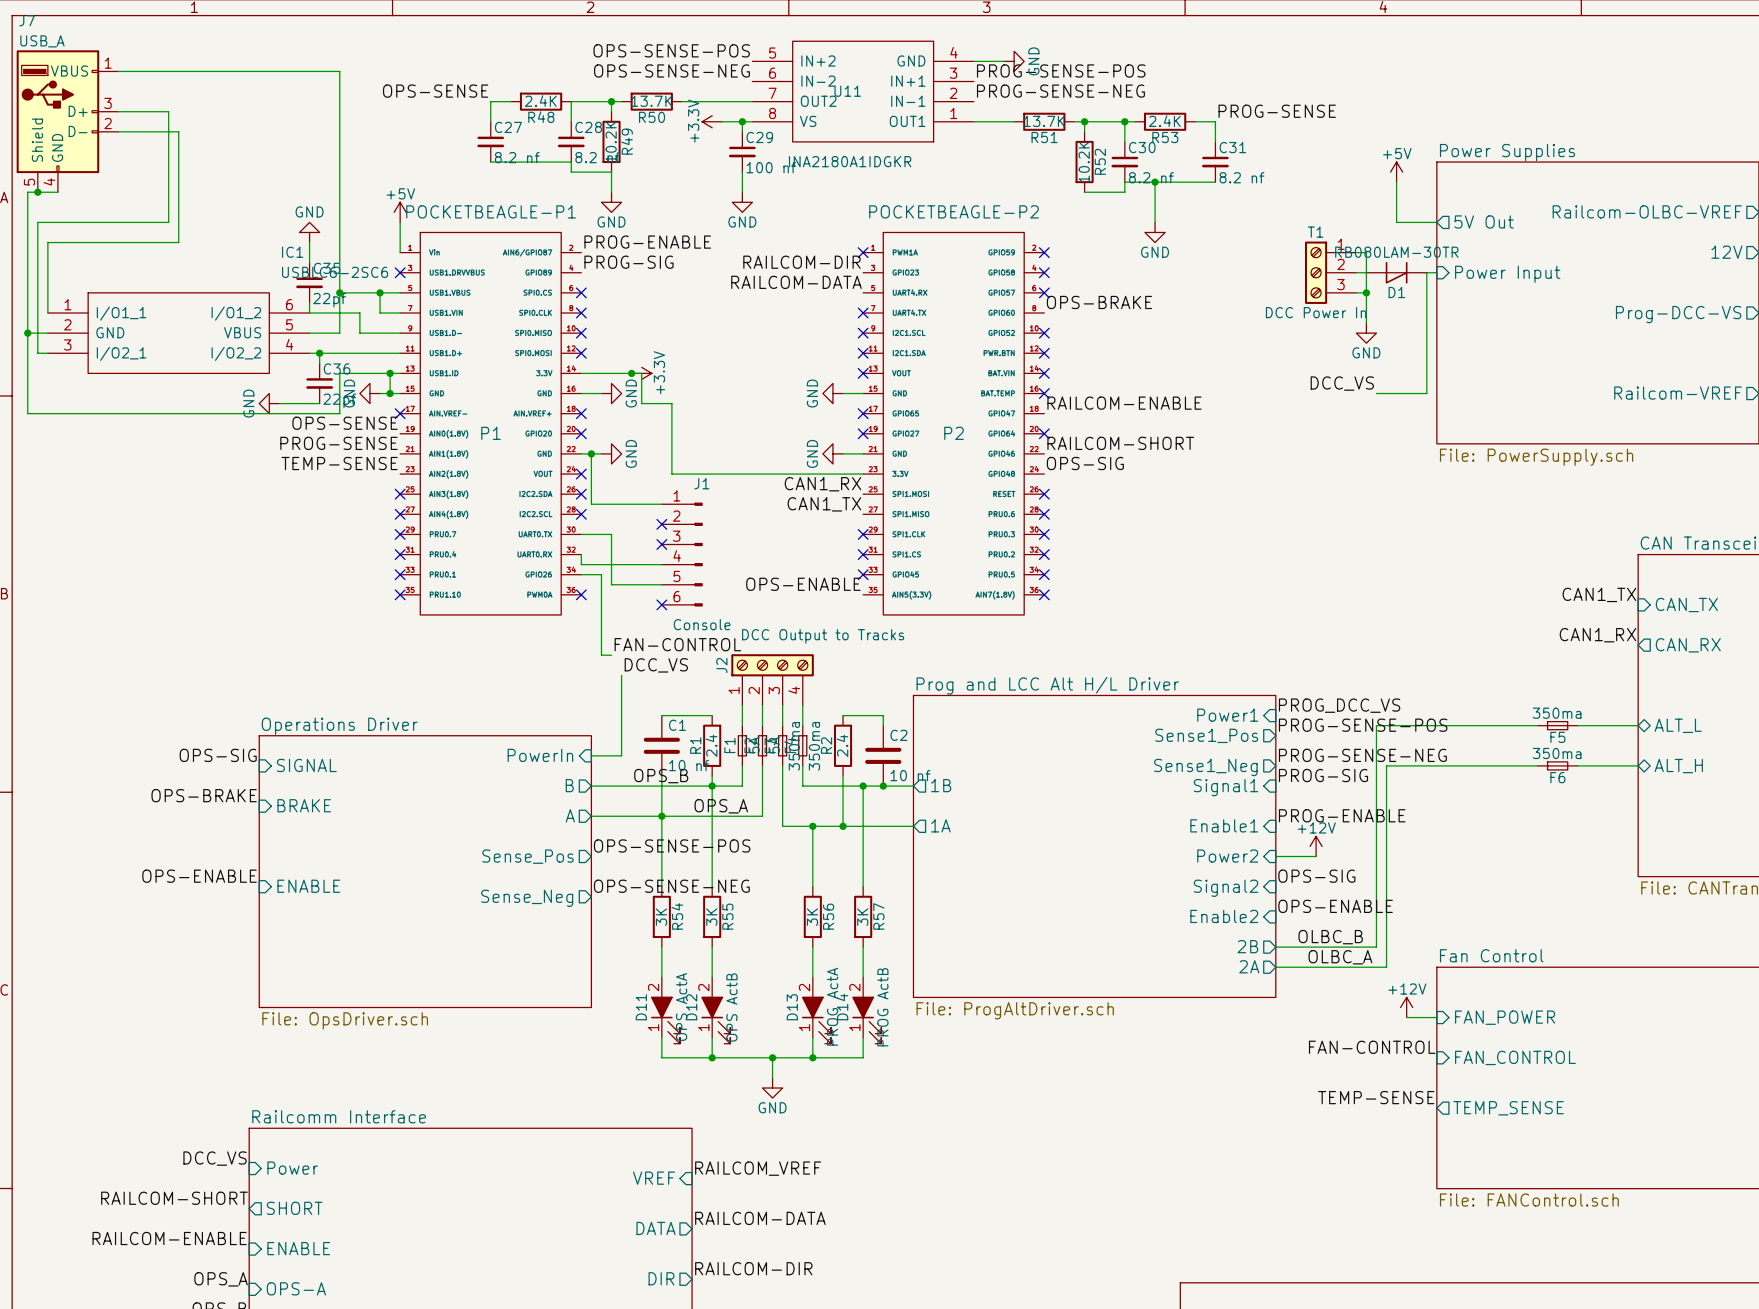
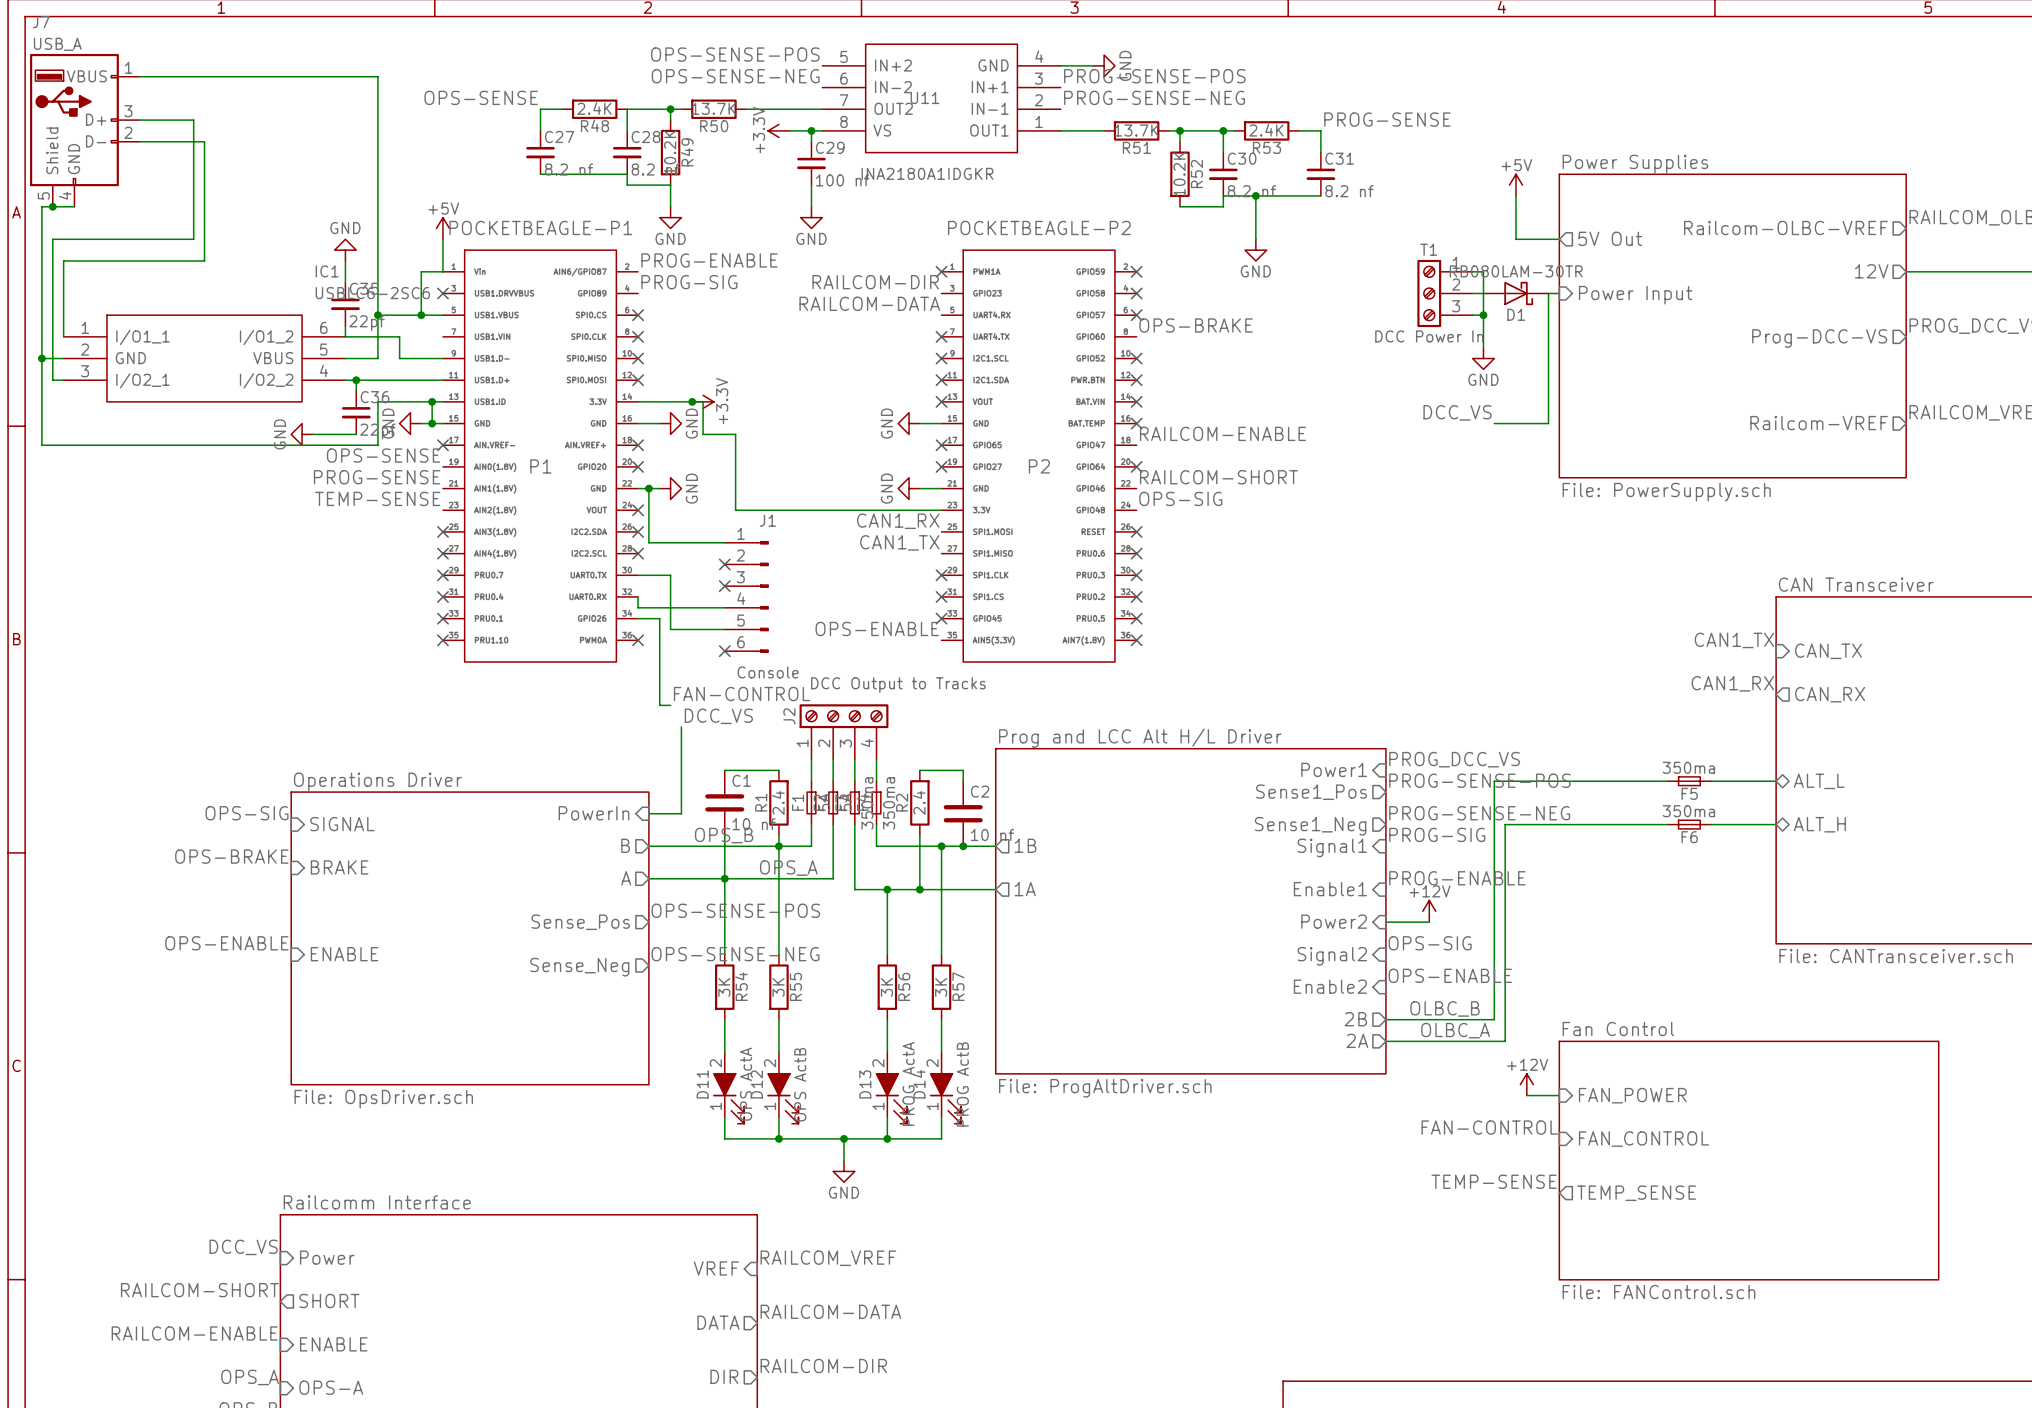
D1 symbol: [1366, 261, 1427, 284] -> [1483, 281, 1549, 306]
wire: (380, 292) (380, 313) (400, 313) -> (421, 315) (421, 271) (442, 271)

